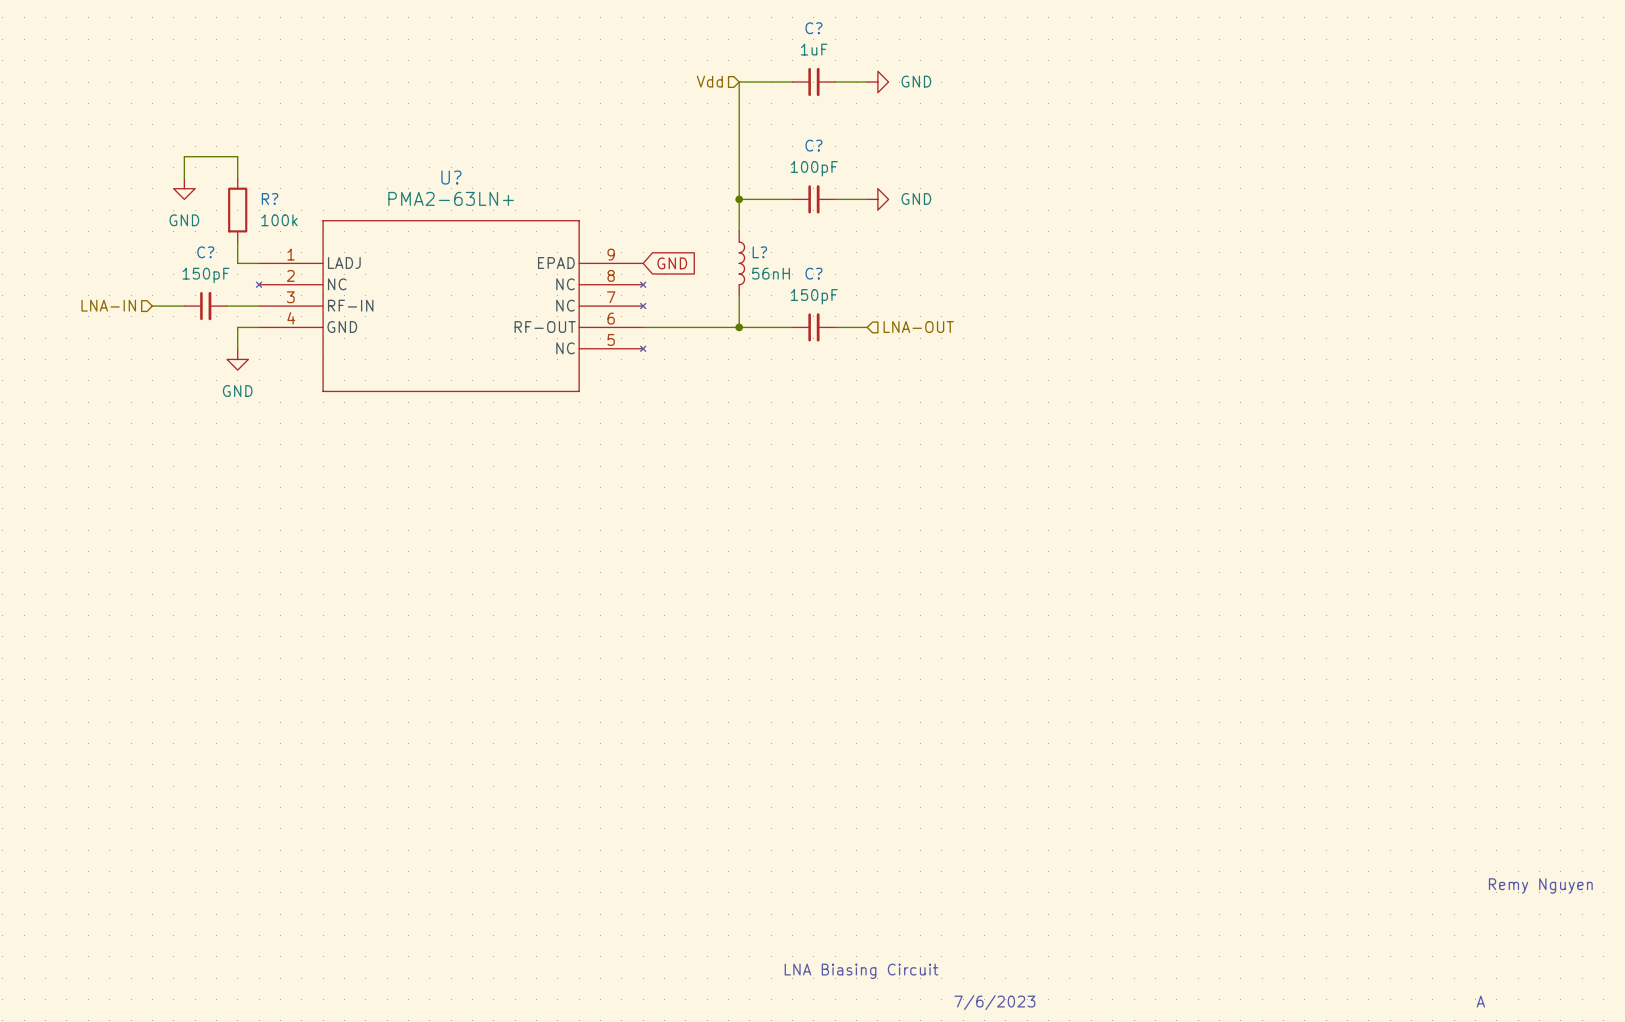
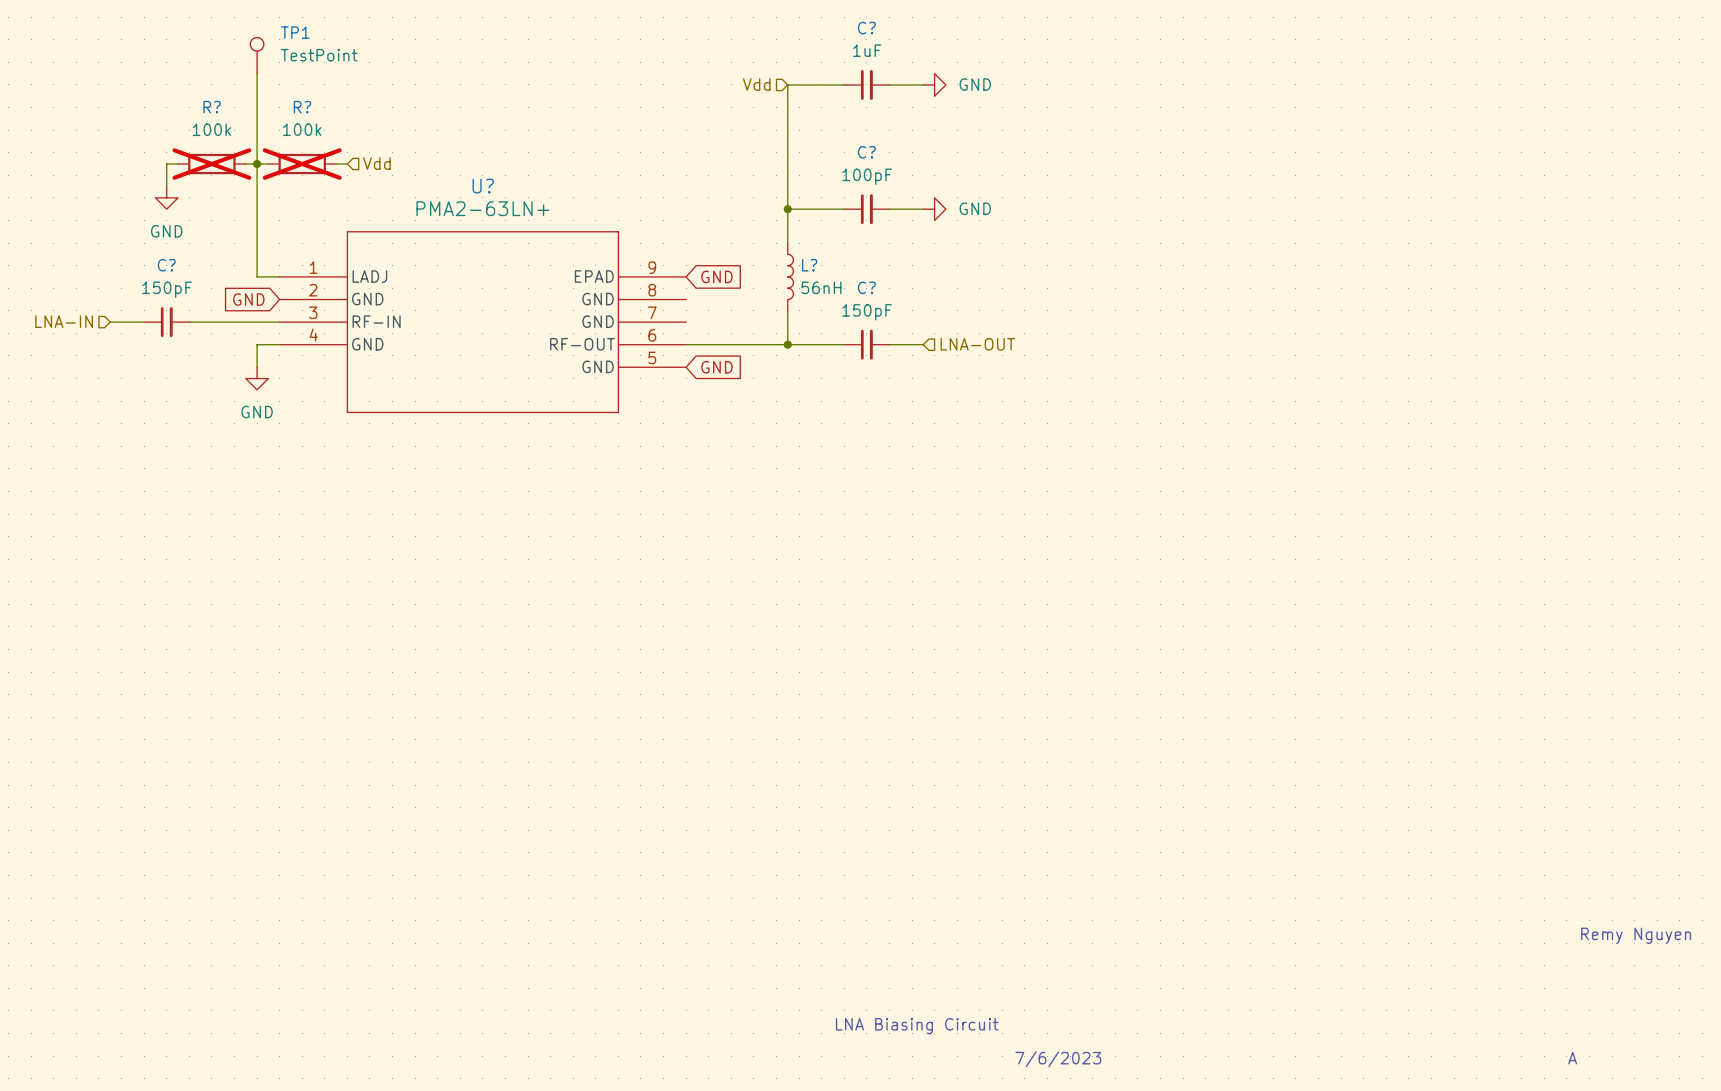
TP1: none -> TestPoint (257, 55)
wire: none -> (257, 73) (257, 164) (268, 164)
wire: none -> (178, 164) (166, 164) (166, 186)
R?: none -> 100k (211, 164)
wire: (227, 156) (184, 156) (184, 178) -> none
junction: none -> (257, 164)
R?: none -> 100k (302, 164)
wire: none -> (336, 164) (347, 164)
hierarchical label: none -> Vdd (376, 163)
wire: none -> (257, 186) (257, 254)
power symbol position: GND (184, 188) -> GND (166, 197)
R?: 100k (237, 210) -> none
U? symbol: [256, 220, 646, 392] -> [279, 231, 687, 414]
global label: none -> GND (248, 299)
hierarchical label position: LNA-IN (108, 305) -> LNA-IN (64, 321)
wire: none -> (110, 322) (144, 322)
C? position: (205, 306) -> (166, 322)
global label: none -> GND (716, 367)

